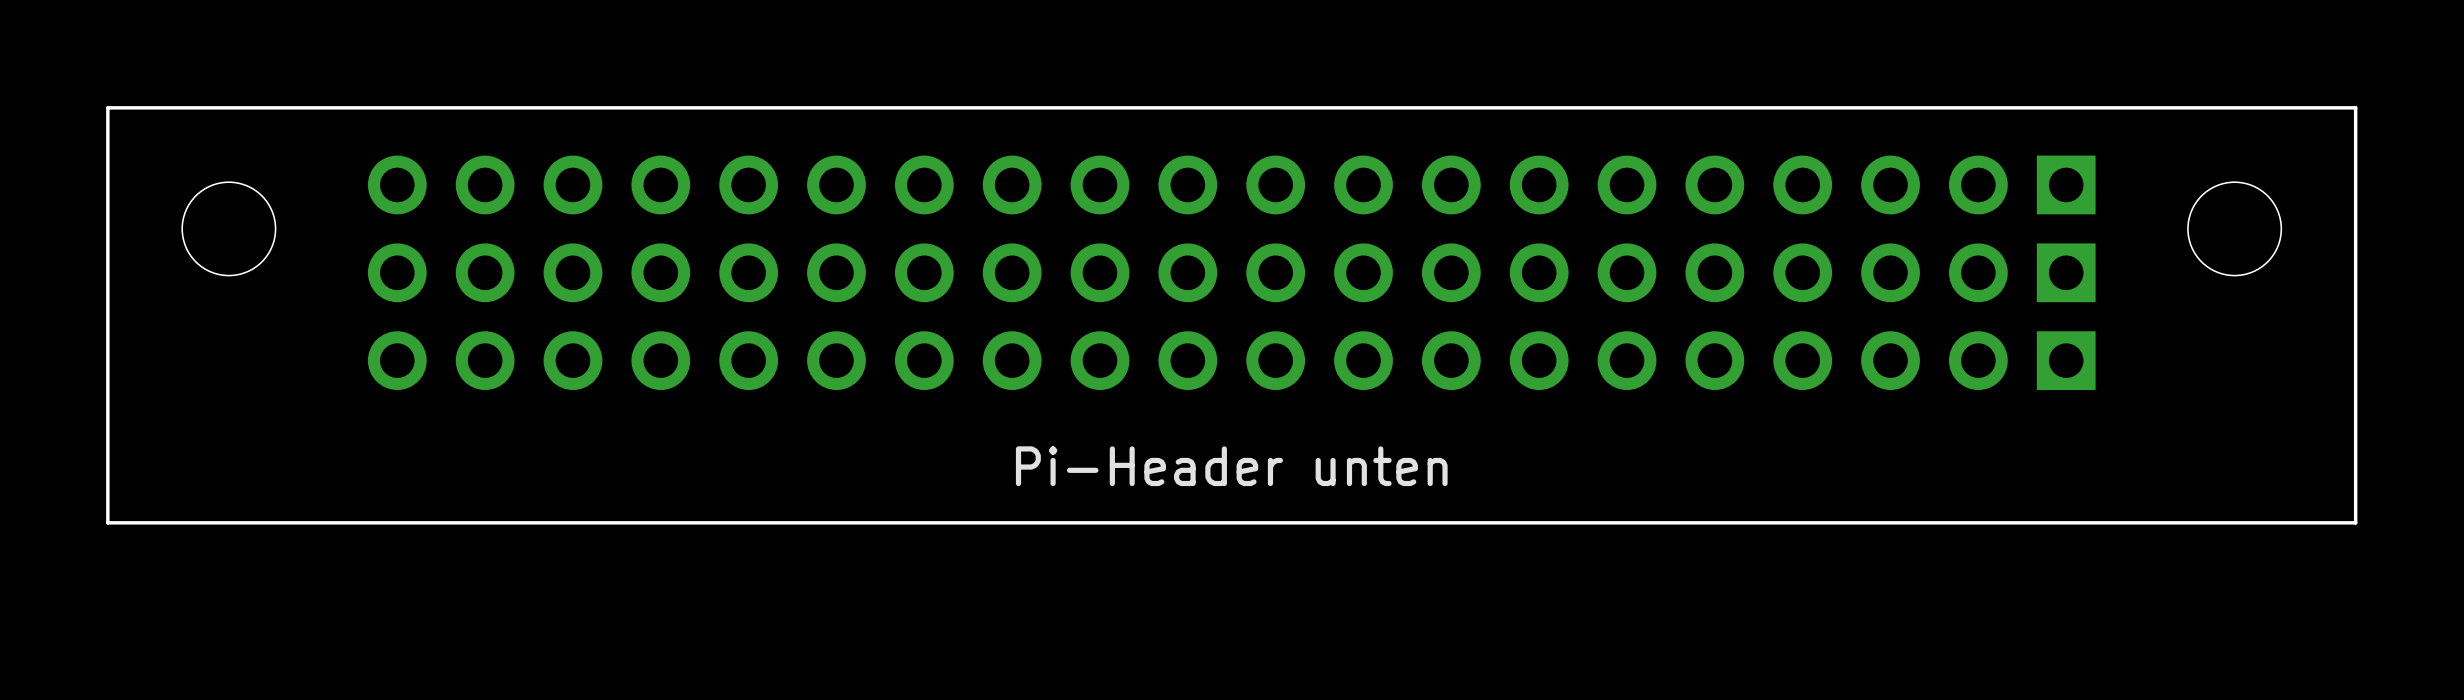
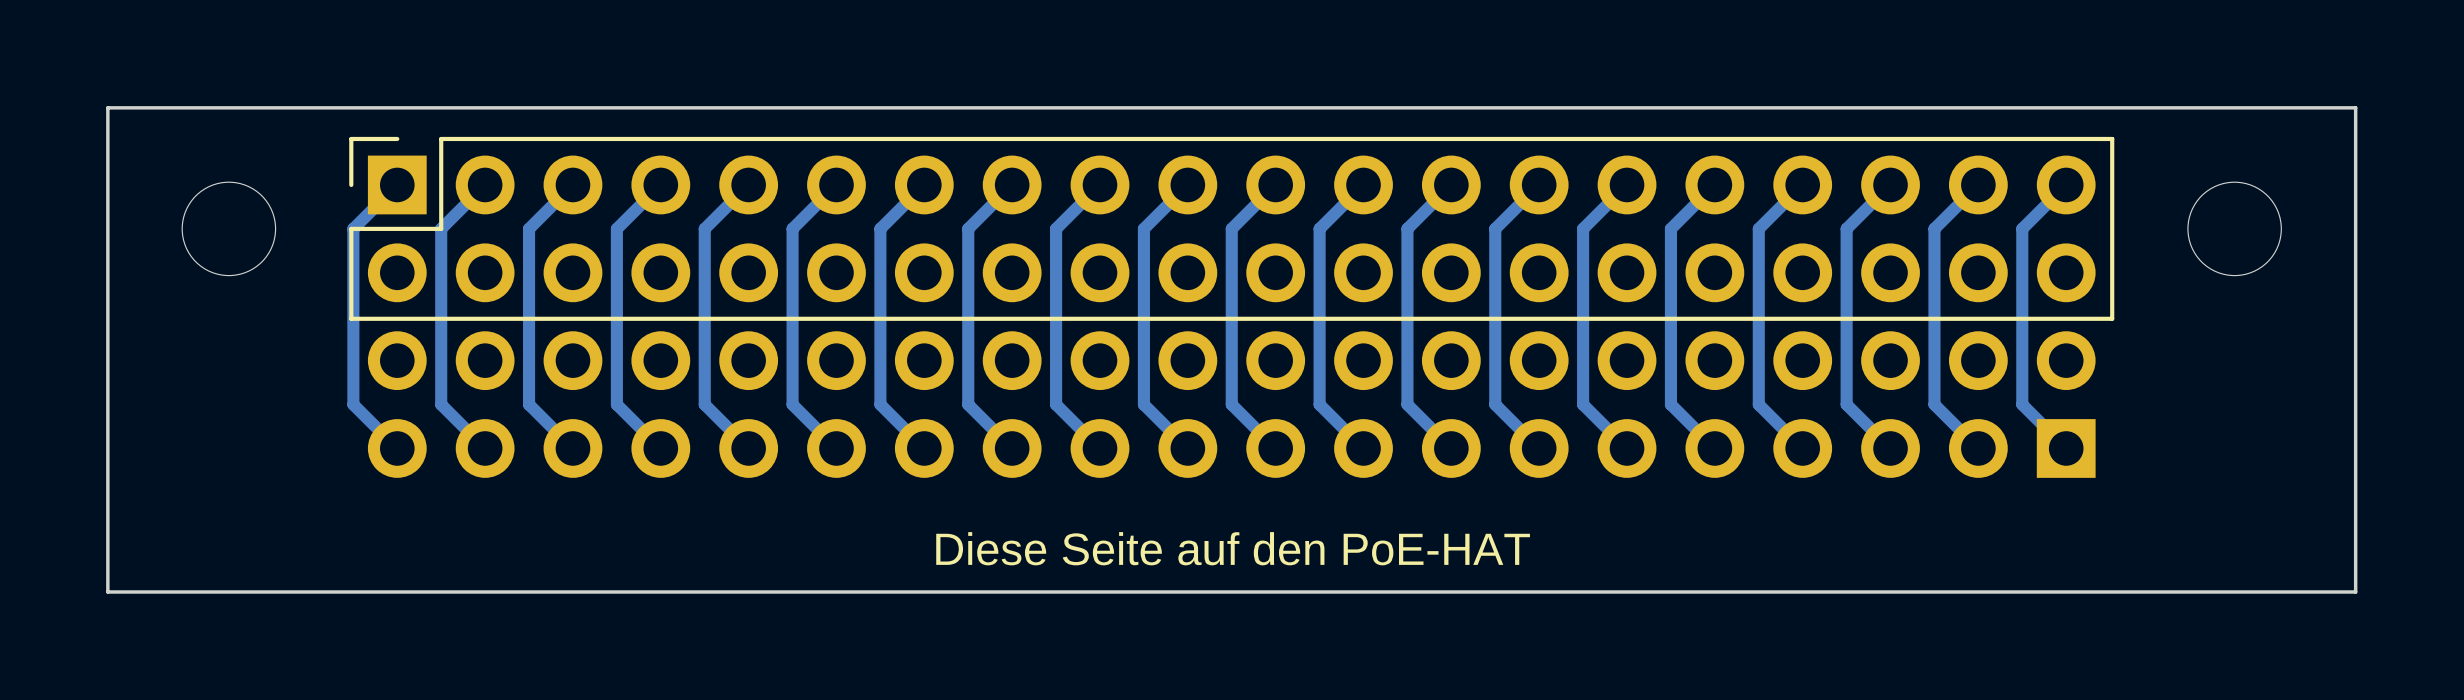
track: none -> (397, 184) (353, 228) (353, 404) (397, 448)
track: none -> (485, 184) (441, 228) (441, 404) (485, 448)
track: none -> (572, 184) (529, 228) (529, 404) (572, 448)
track: none -> (660, 184) (616, 228) (616, 404) (660, 448)
track: none -> (748, 184) (704, 228) (704, 404) (748, 448)
track: none -> (836, 184) (792, 228) (792, 404) (836, 448)
track: none -> (924, 184) (880, 228) (880, 404) (924, 448)
track: none -> (1012, 184) (968, 228) (968, 404) (1012, 448)
track: none -> (1100, 184) (1056, 228) (1056, 404) (1100, 448)
track: none -> (1187, 184) (1143, 228) (1143, 404) (1187, 448)
part: (1231, 184) -> none
track: none -> (1275, 184) (1231, 228) (1231, 404) (1275, 448)
track: none -> (1363, 184) (1319, 228) (1319, 404) (1363, 448)
track: none -> (1451, 184) (1407, 228) (1407, 404) (1451, 448)
track: none -> (1539, 184) (1495, 228) (1495, 404) (1539, 448)
track: none -> (1627, 184) (1583, 228) (1583, 404) (1627, 448)
track: none -> (1714, 184) (1670, 228) (1670, 404) (1714, 448)
track: none -> (1802, 184) (1758, 228) (1758, 404) (1802, 448)
track: none -> (1890, 184) (1846, 228) (1846, 404) (1890, 448)
track: none -> (1978, 184) (1934, 228) (1934, 404) (1978, 448)
track: none -> (2066, 184) (2022, 228) (2022, 404) (2066, 448)
part: none -> (1231, 228)
part: (1231, 272) -> none
part: (1231, 360) -> none
part: none -> (1231, 404)
text: Pi-Header unten (1231, 466) -> none
board edge: (2355, 522) (107, 522) -> (2355, 522) (2355, 591) (107, 591) (107, 522)
text: none -> Diese Seite auf den PoE-HAT (1233, 548)

